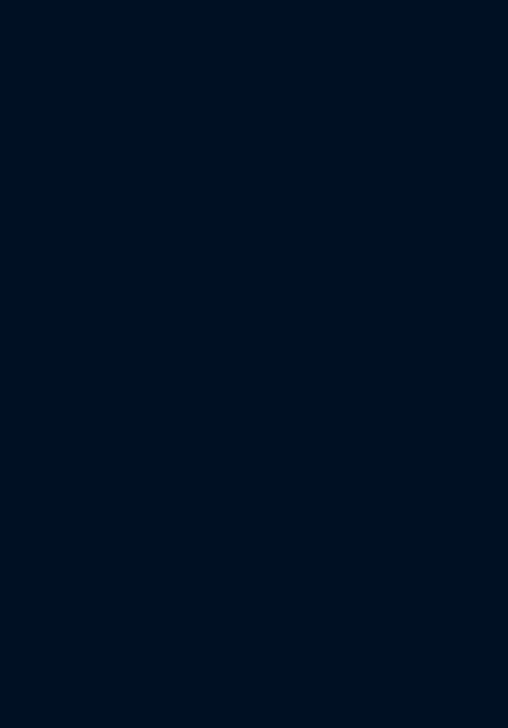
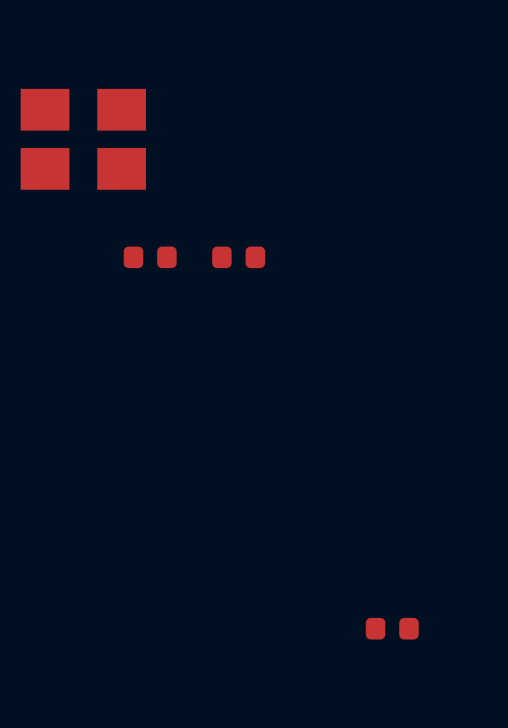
part: none -> (83, 139)
part: none -> (150, 257)
part: none -> (238, 257)
part: none -> (392, 628)

